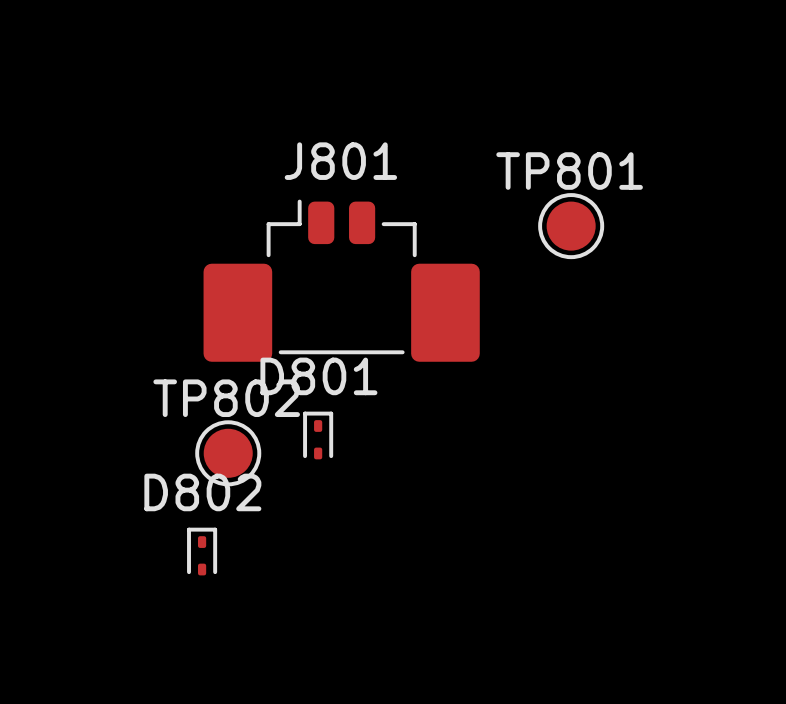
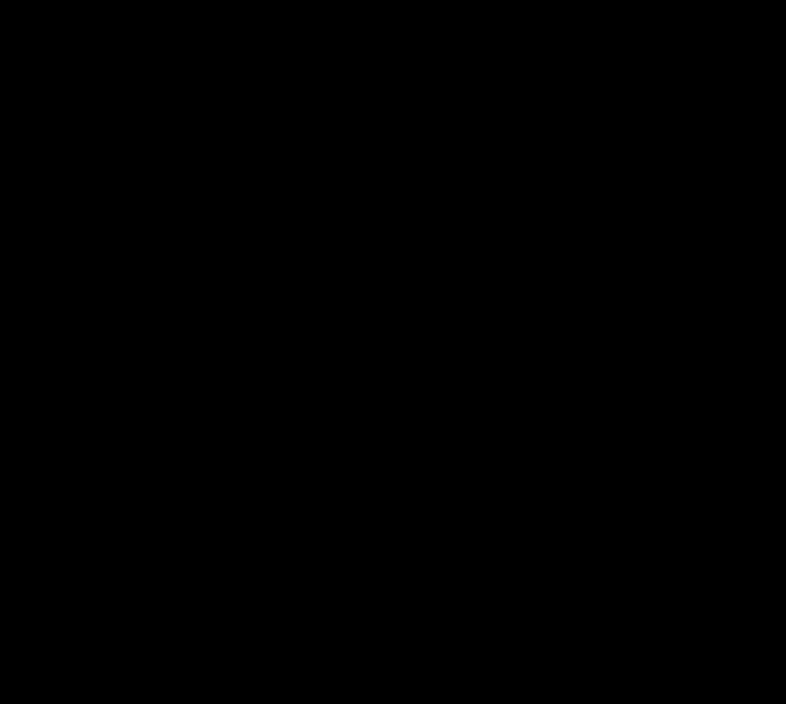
TP801: (571, 226) -> none
J801: (341, 280) -> none
D801: (318, 435) -> none
TP802: (228, 453) -> none
D802: (202, 551) -> none

